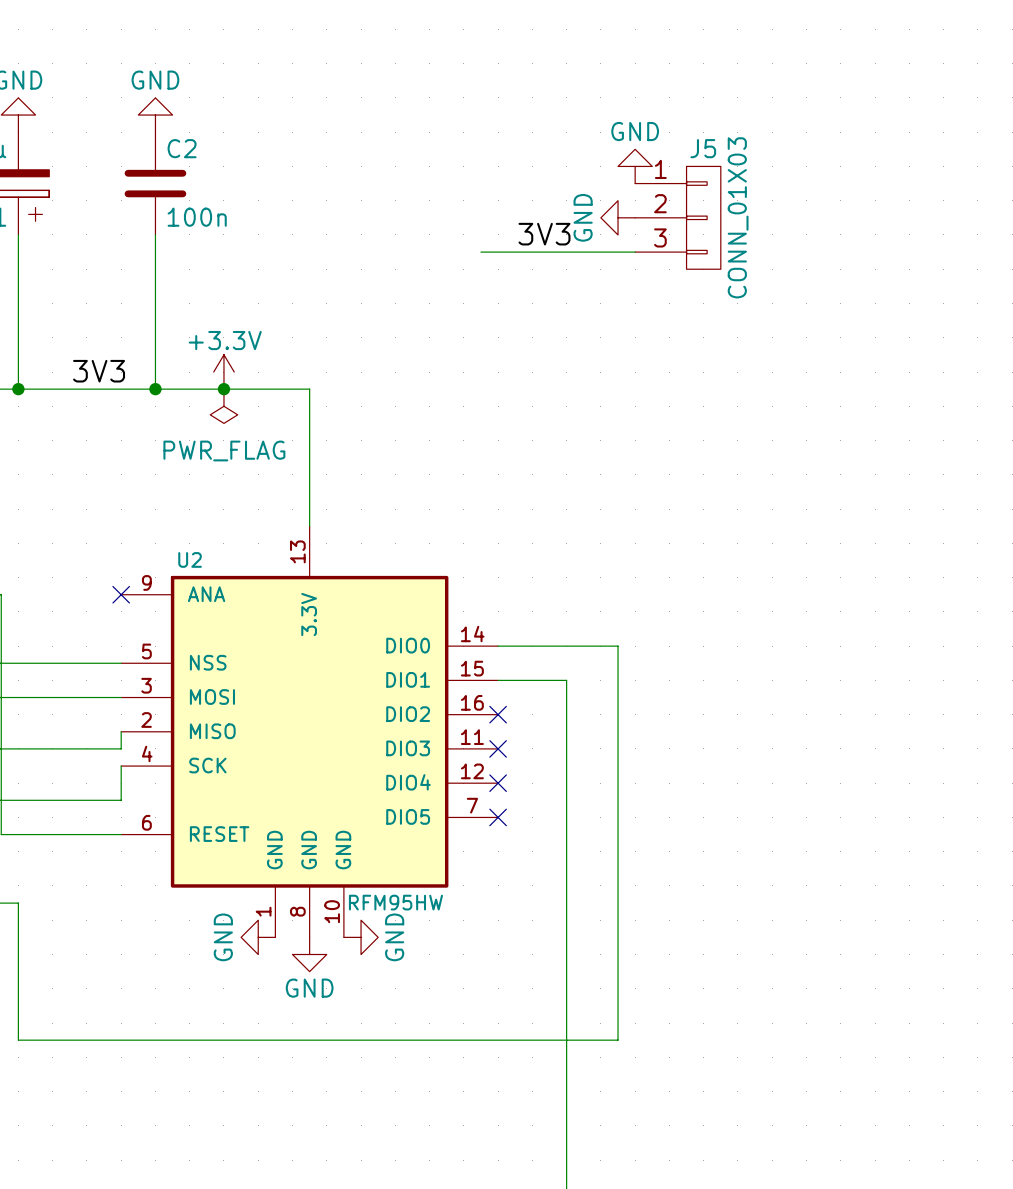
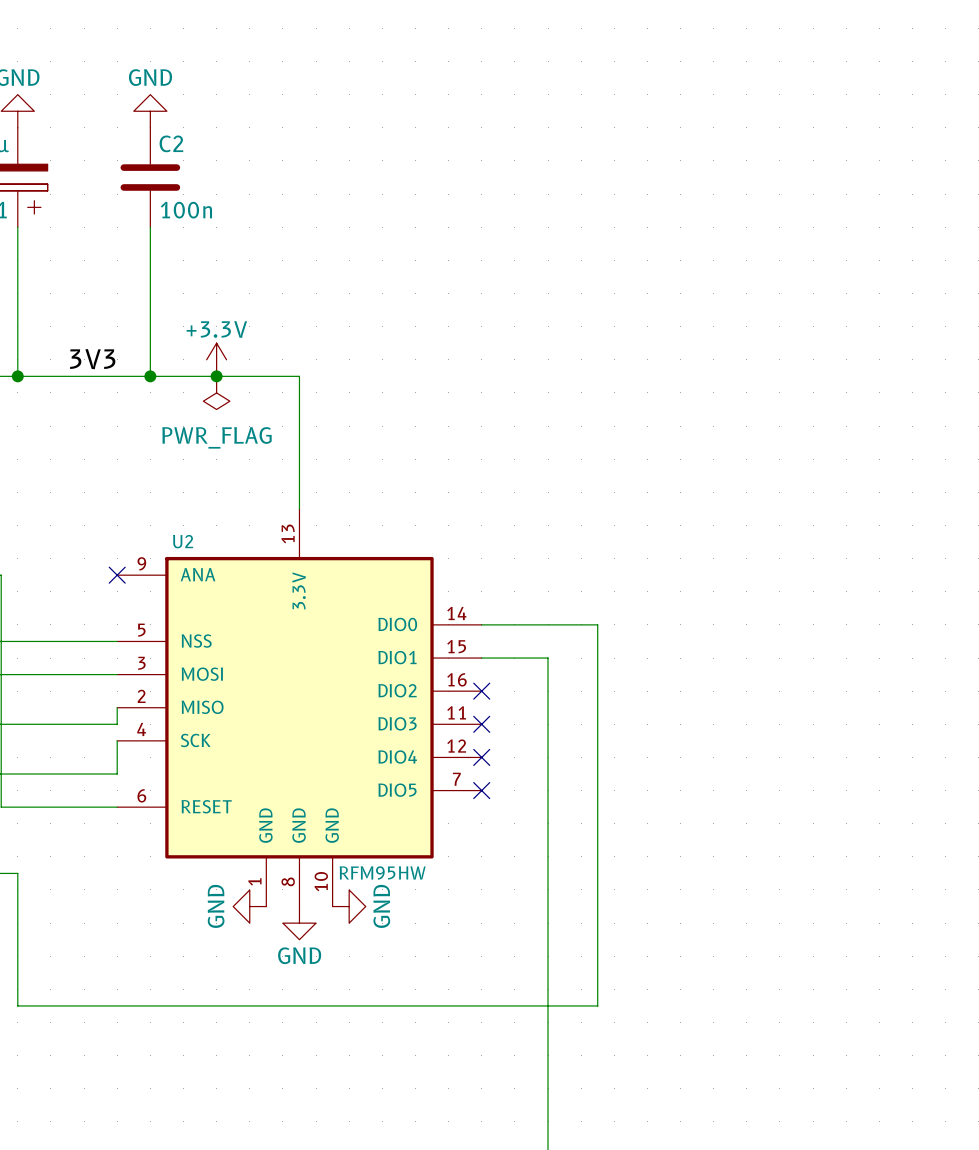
power symbol: GND (635, 166) -> none
power symbol: GND (618, 217) -> none
J5: CONN_01X03 (677, 217) -> none
label: 3V3 (544, 234) -> none
wire: (480, 252) (635, 252) -> none

